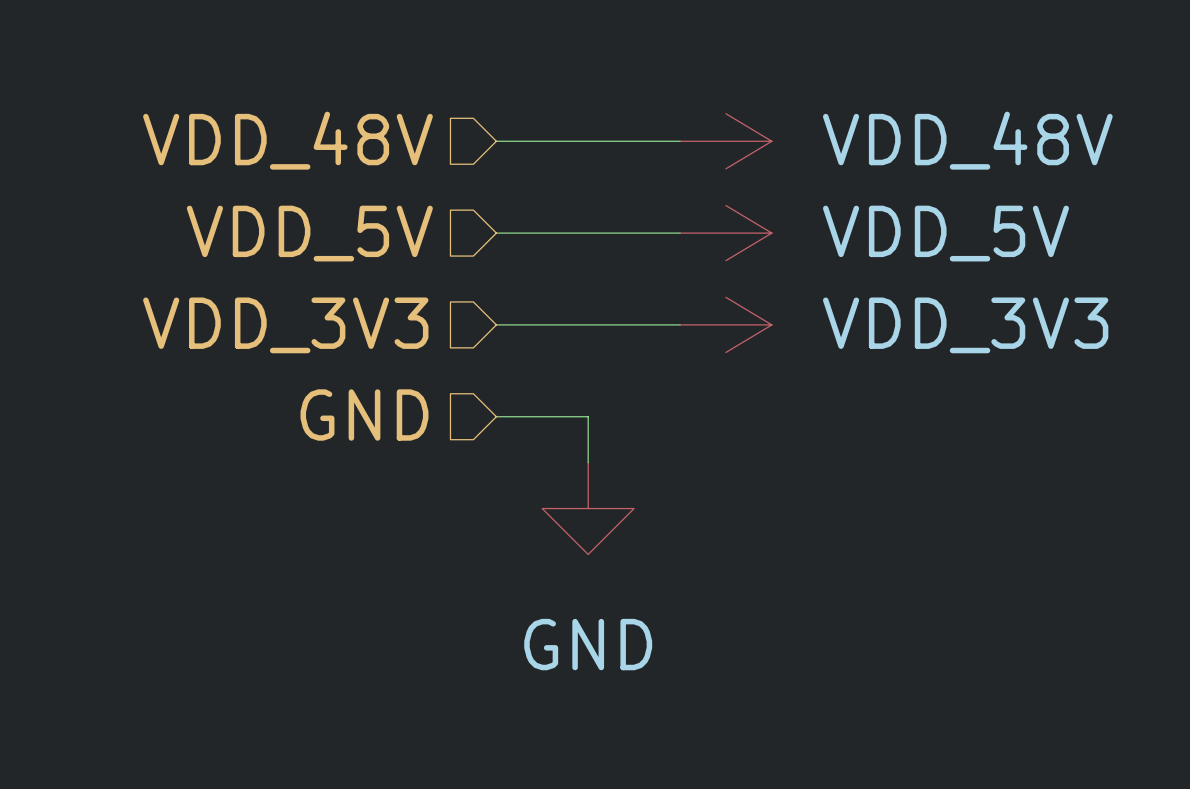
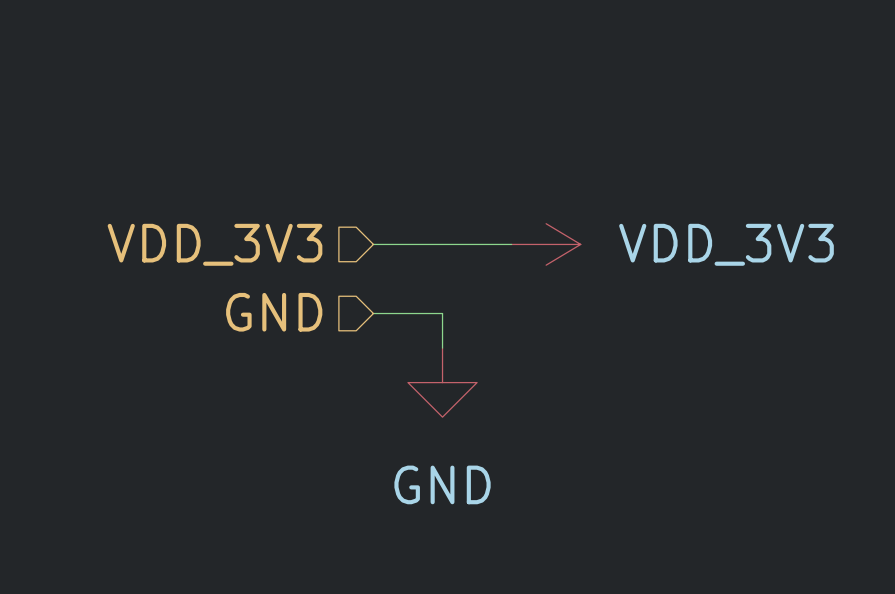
hierarchical label: VDD_48V (287, 140) -> none
wire: (496, 141) (680, 141) -> none
power symbol: VDD_48V (725, 141) -> none
hierarchical label: VDD_5V (309, 233) -> none
wire: (496, 233) (680, 233) -> none
power symbol: VDD_5V (725, 233) -> none

